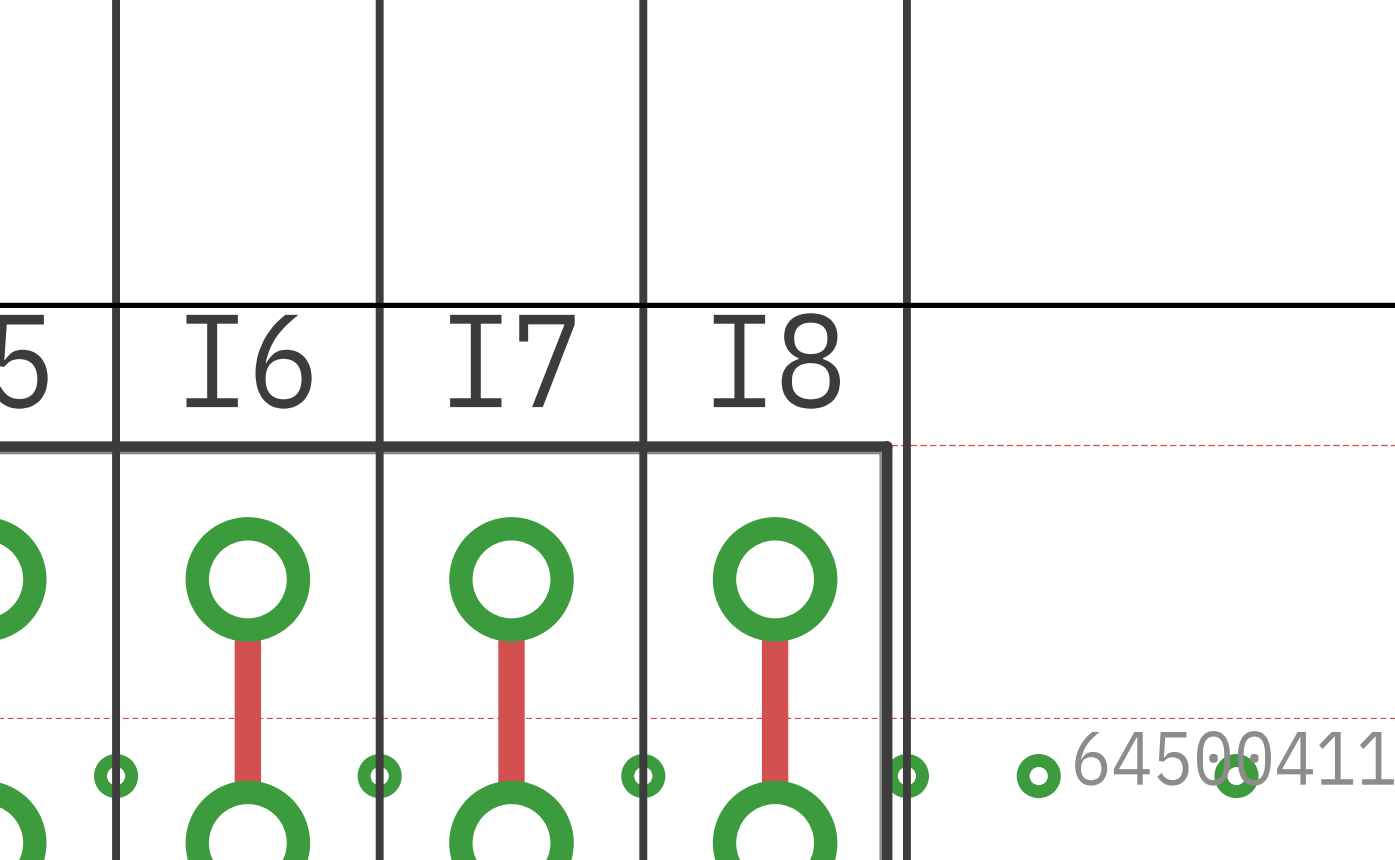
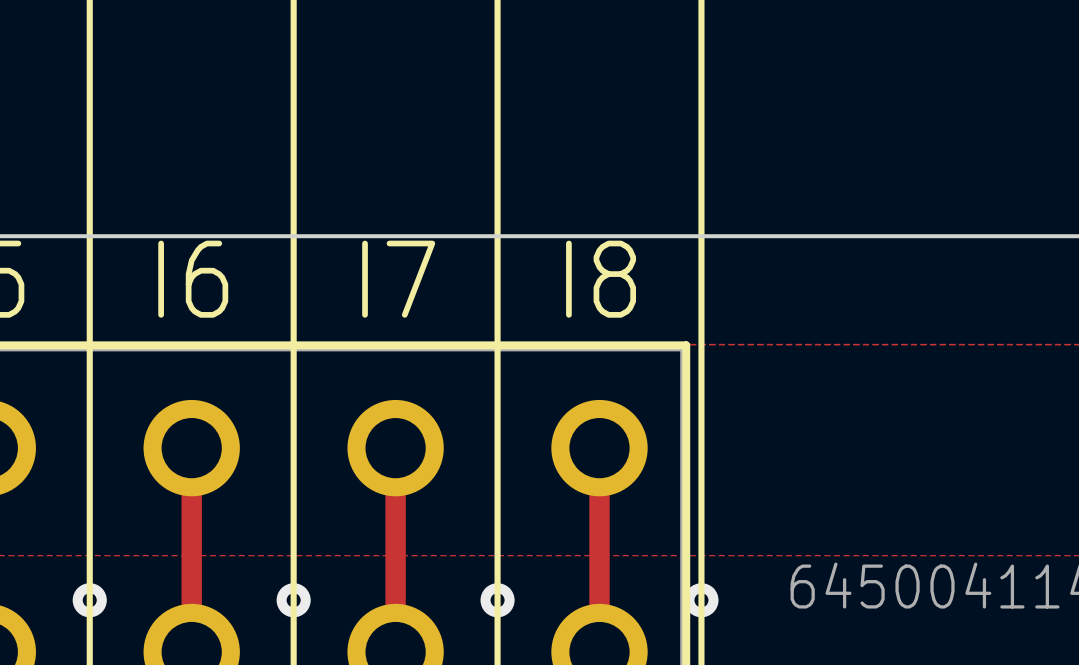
via: (1038, 776) -> none
via: (1236, 776) -> none

